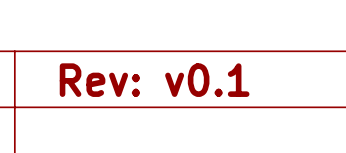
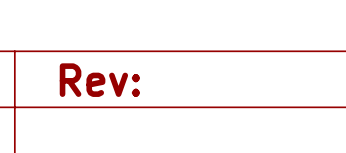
title block: Rev: v0.1 (154, 80) -> Rev: (99, 80)

